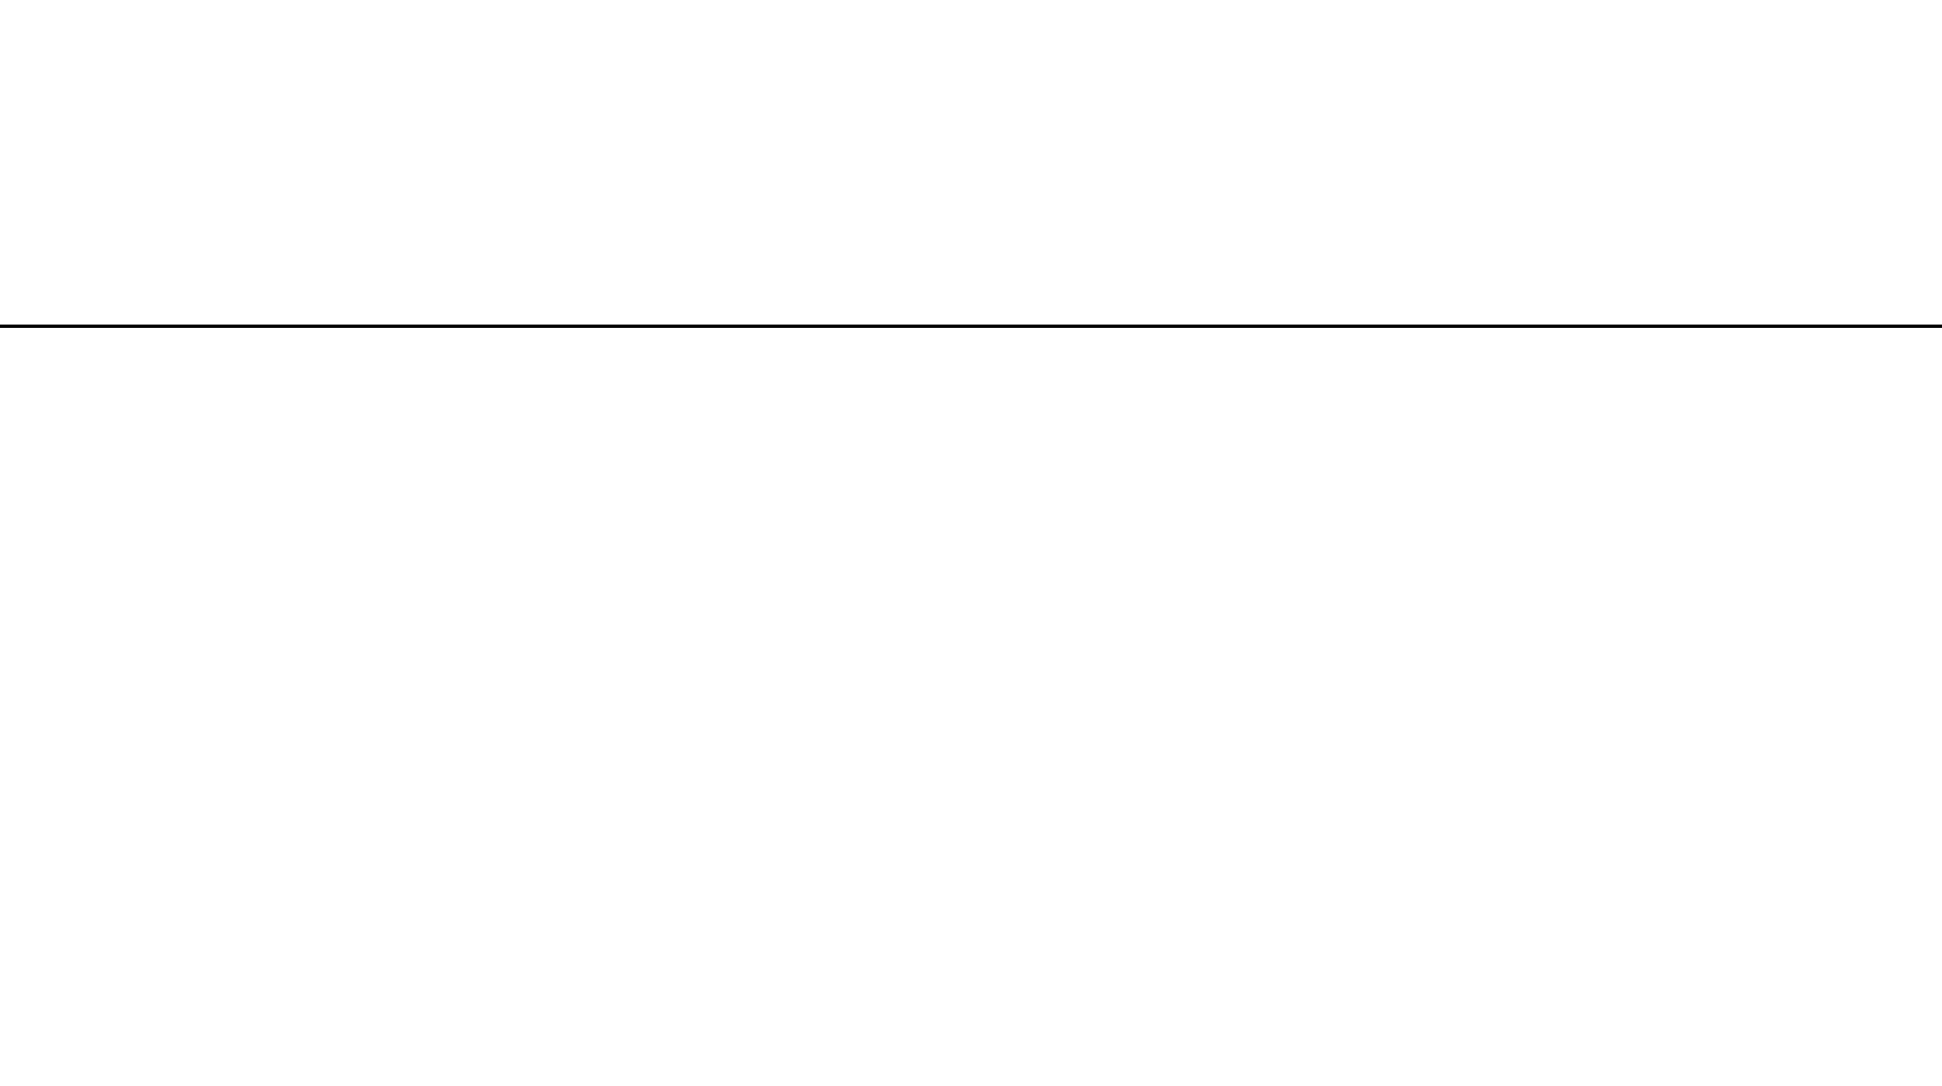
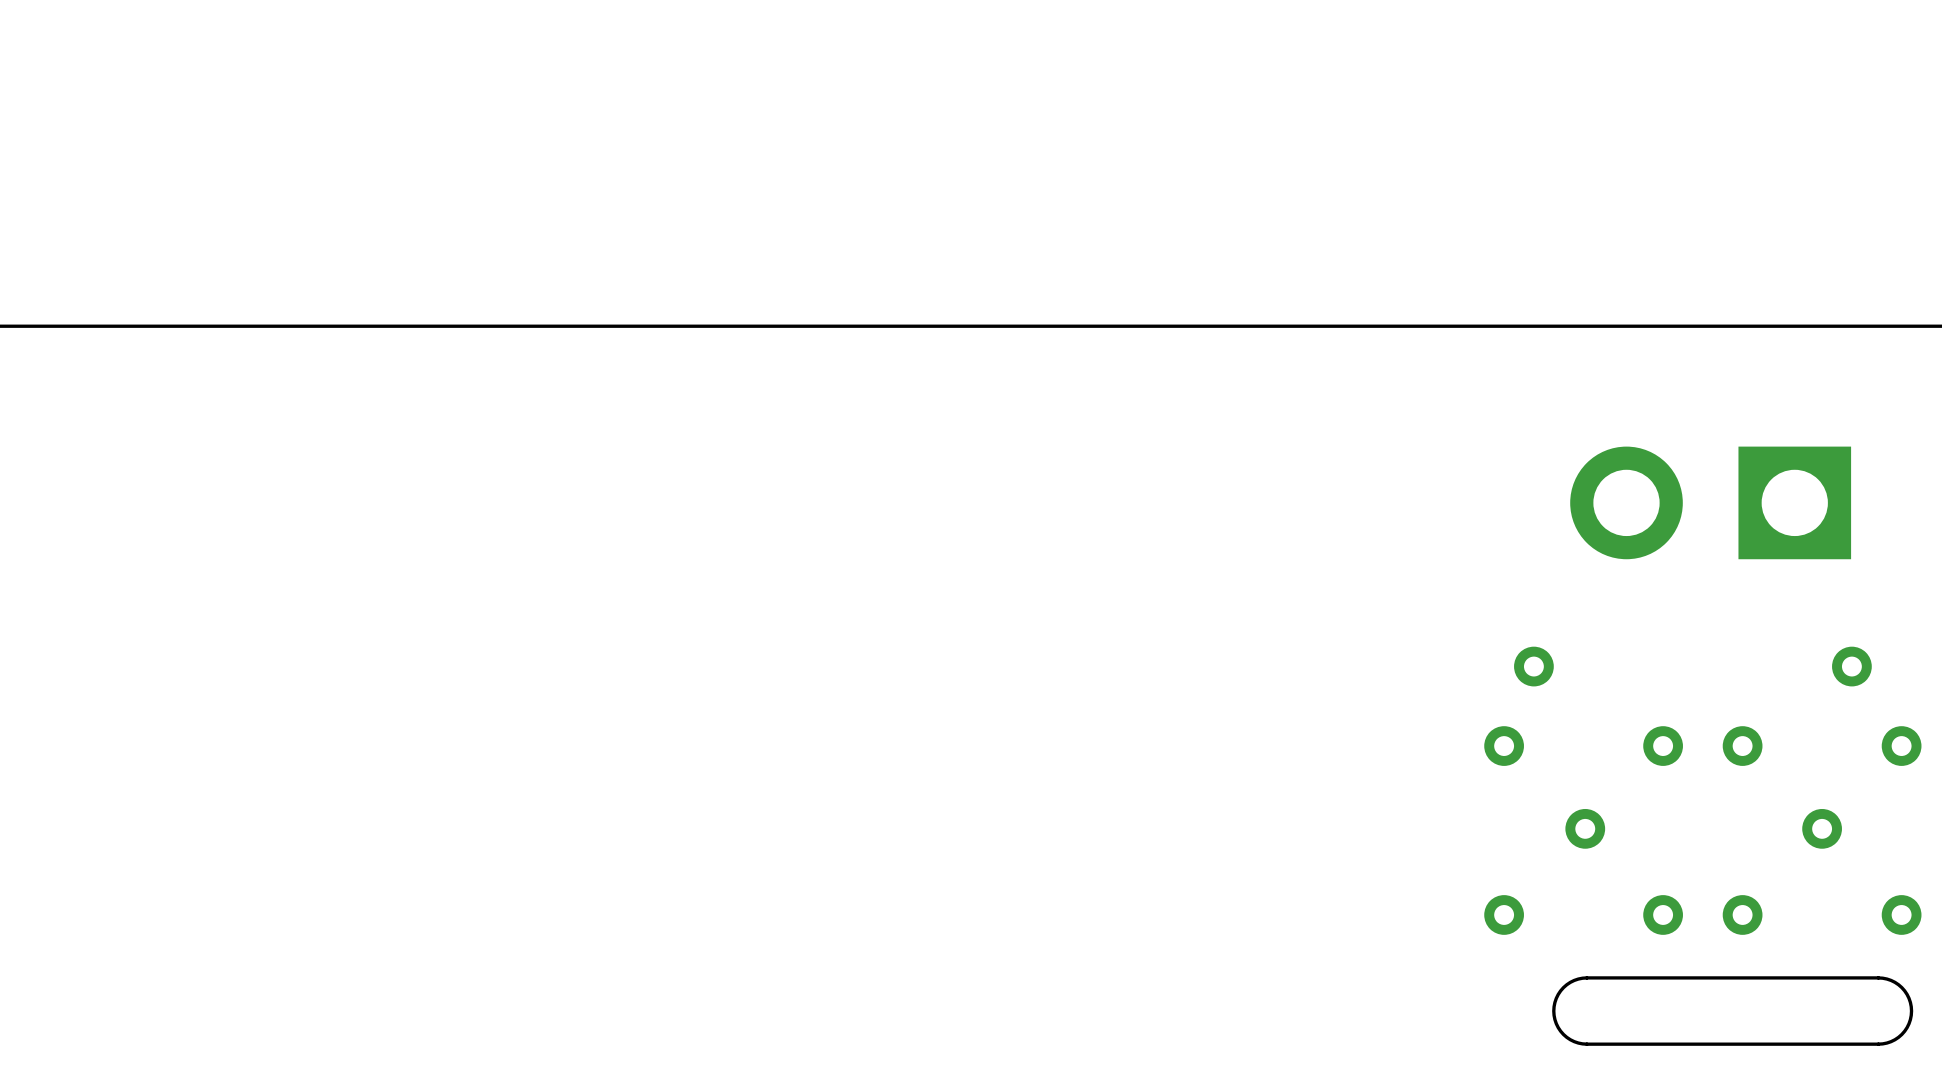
part: none -> (1710, 502)
via: none -> (1533, 666)
via: none -> (1851, 666)
via: none -> (1504, 746)
via: none -> (1663, 746)
via: none -> (1742, 746)
via: none -> (1901, 746)
via: none -> (1585, 828)
via: none -> (1822, 828)
via: none -> (1504, 914)
via: none -> (1663, 914)
via: none -> (1742, 914)
via: none -> (1901, 914)
board edge: none -> (1878, 977) (1582, 978) (1570, 982) (1560, 990) (1554, 1002) (1554, 1015) (1556, 1023) (1563, 1034) (1574, 1041) (1582, 1043) (1882, 1043) (1894, 1039) (1904, 1031) (1909, 1023) (1911, 1011) (1909, 998) (1901, 987) (1891, 980) (1878, 977)

